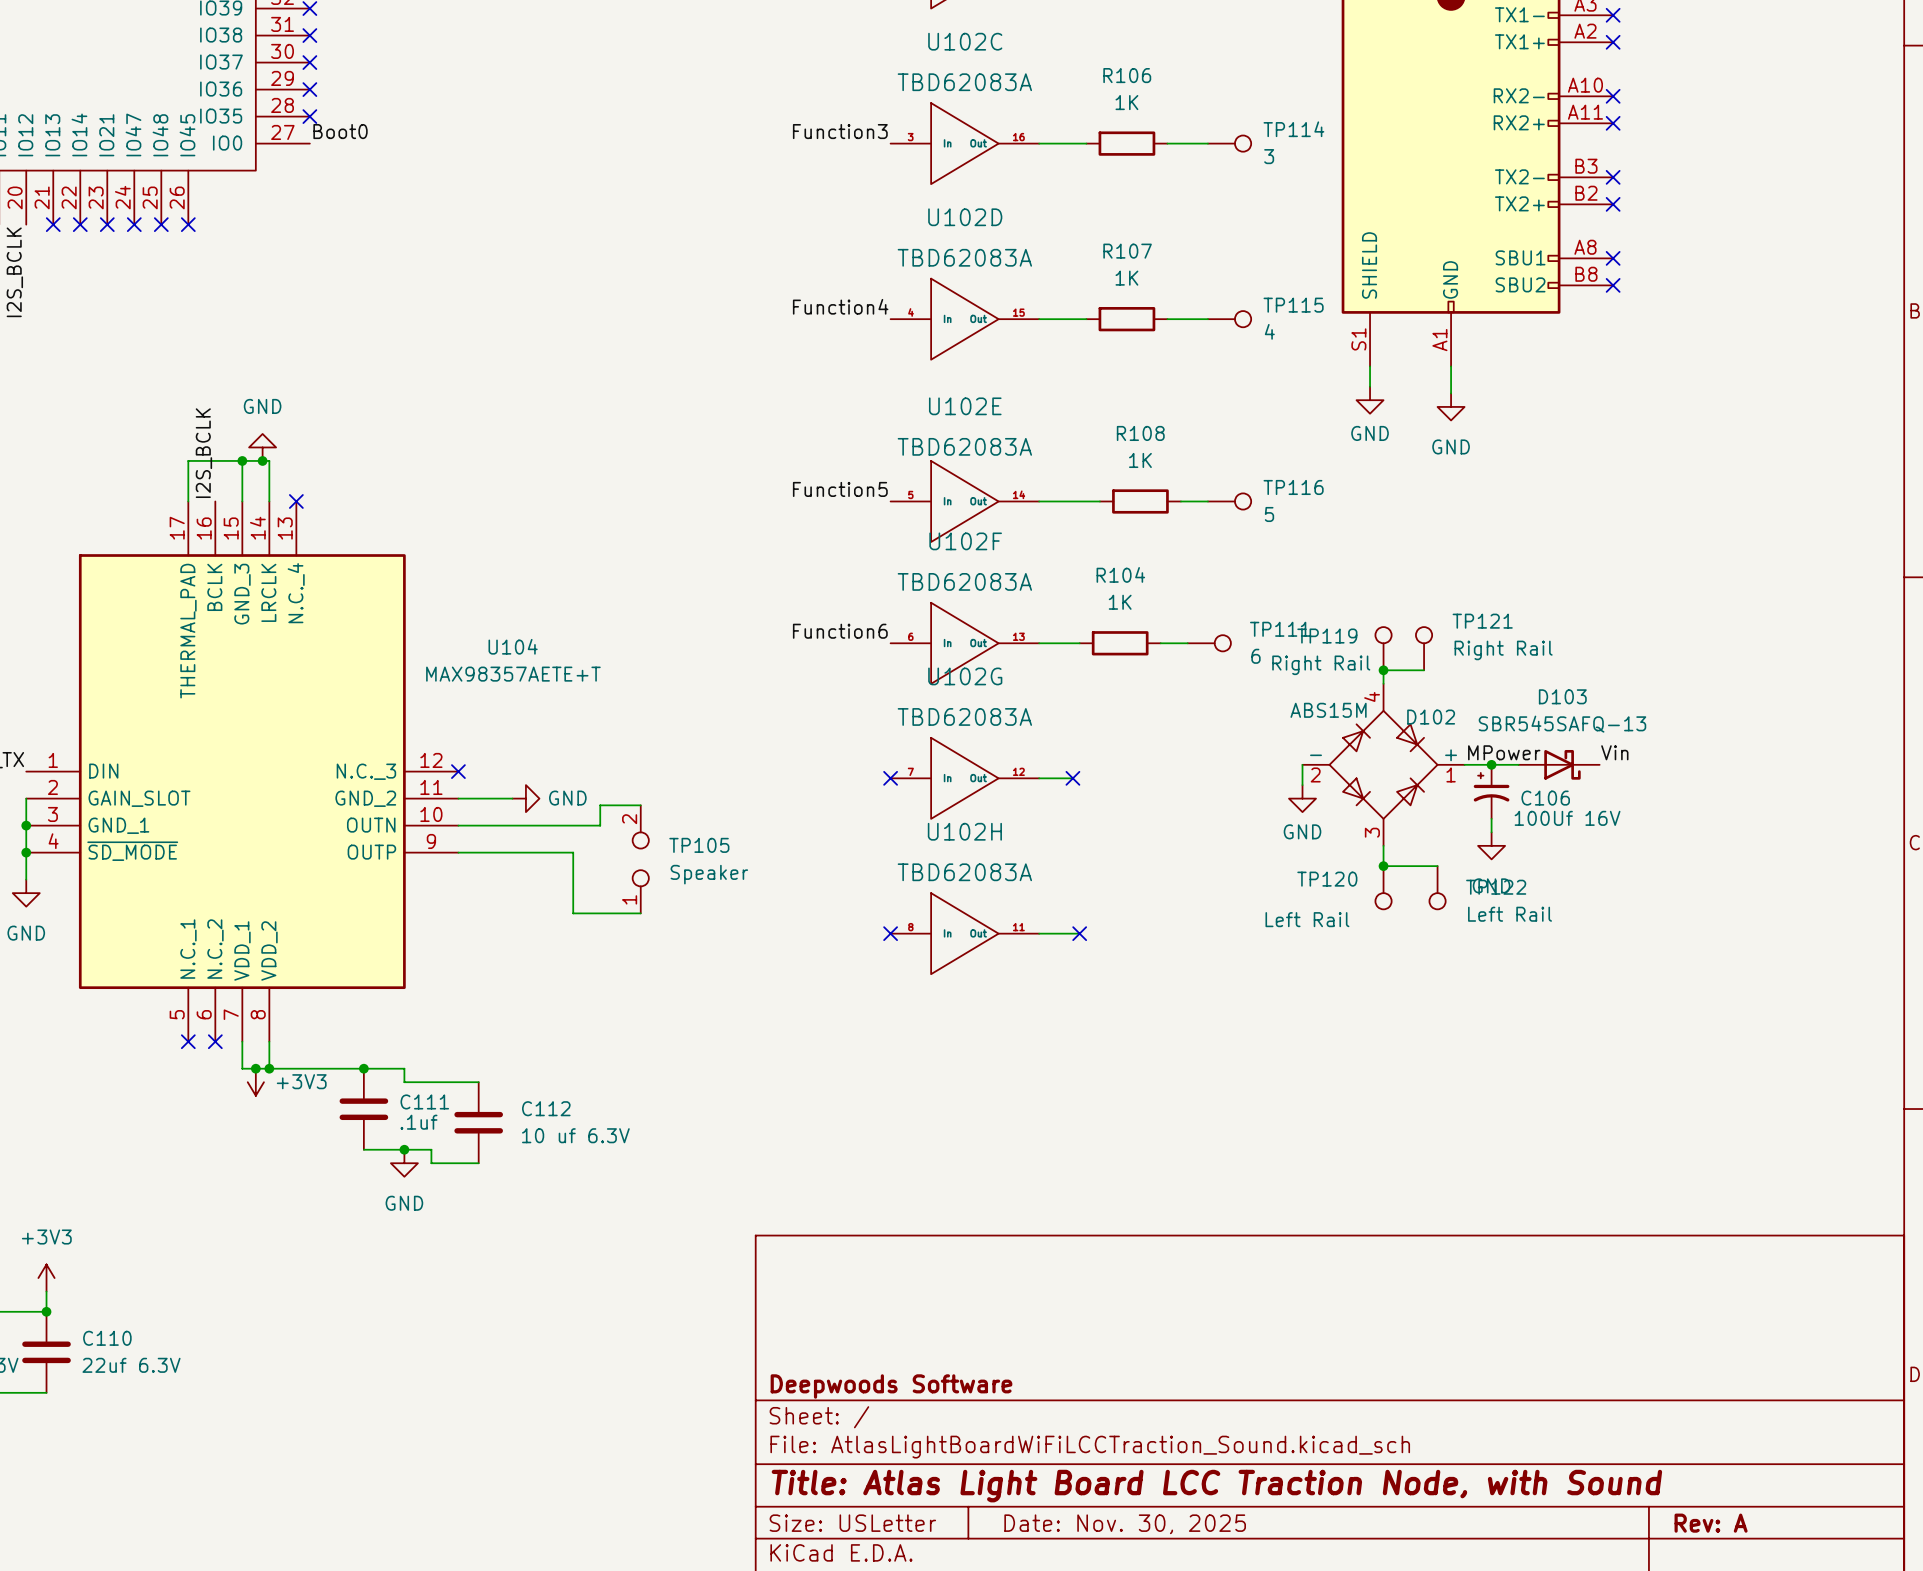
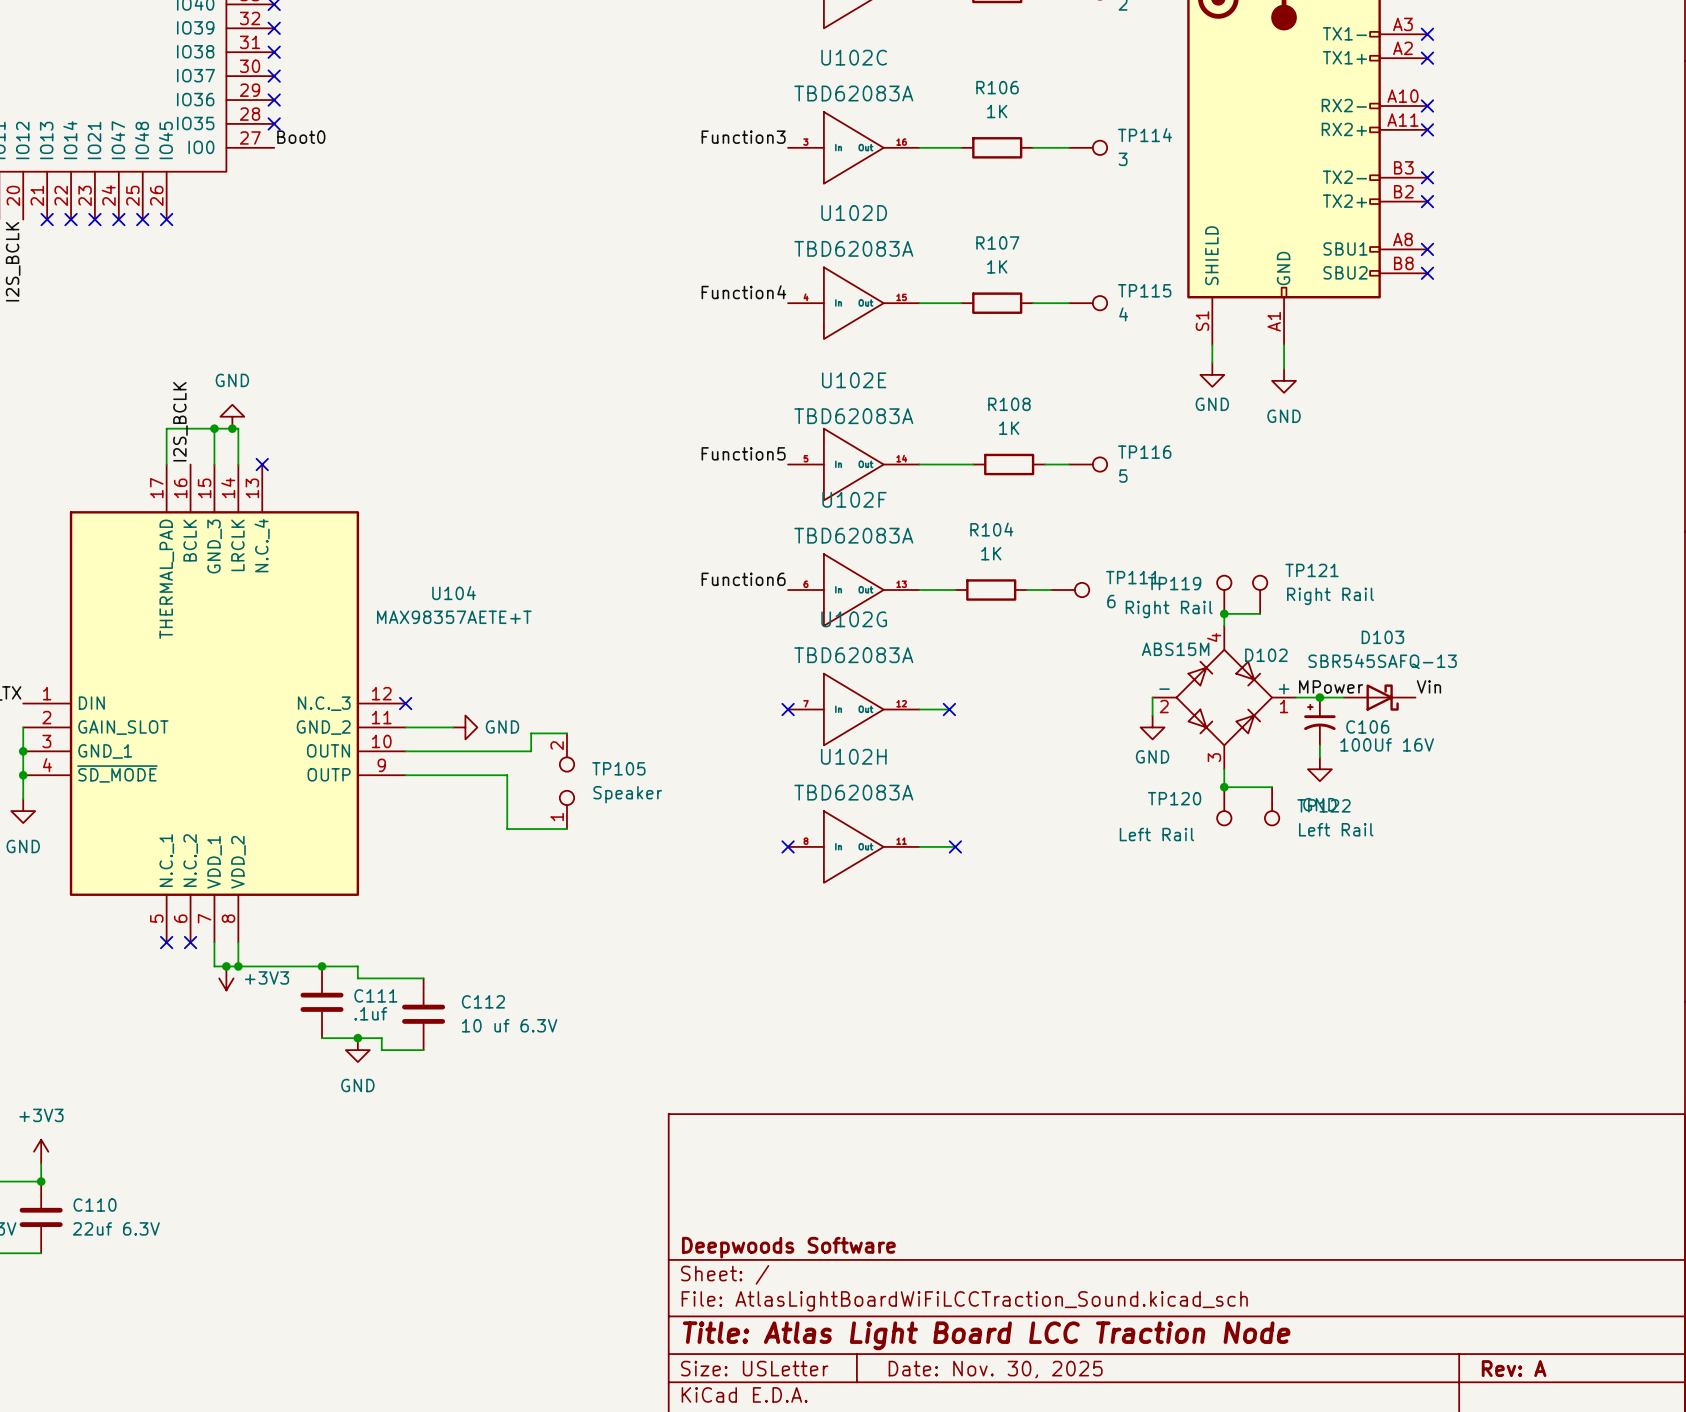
title block: Title: Atlas Light Board LCC Traction Node, with Sound (1216, 1486) -> Title: Atlas Light Board LCC Traction Node (986, 1335)

